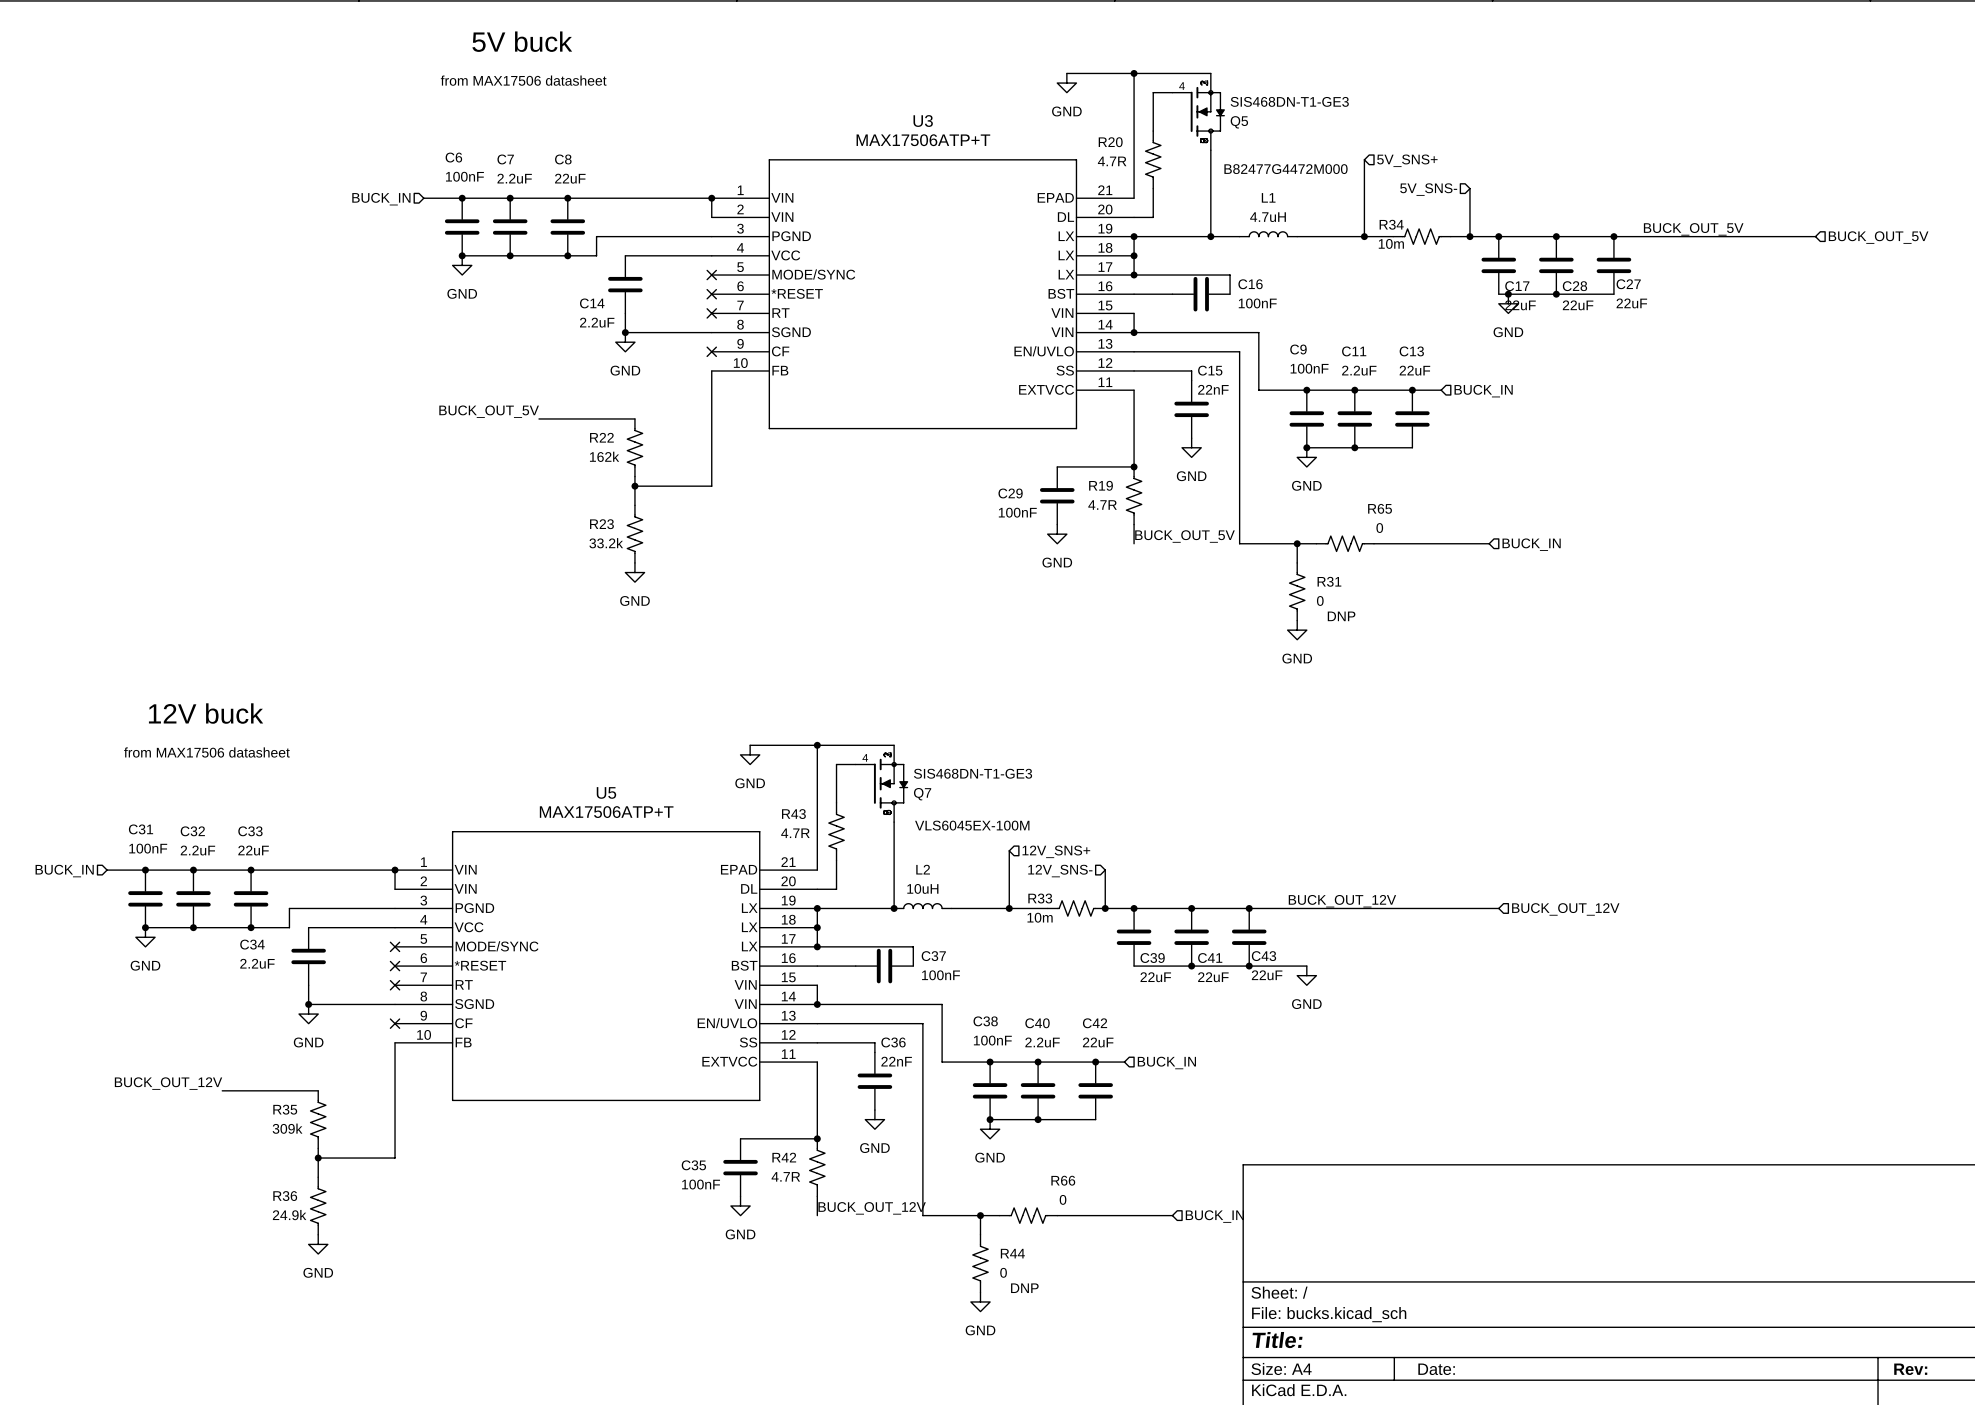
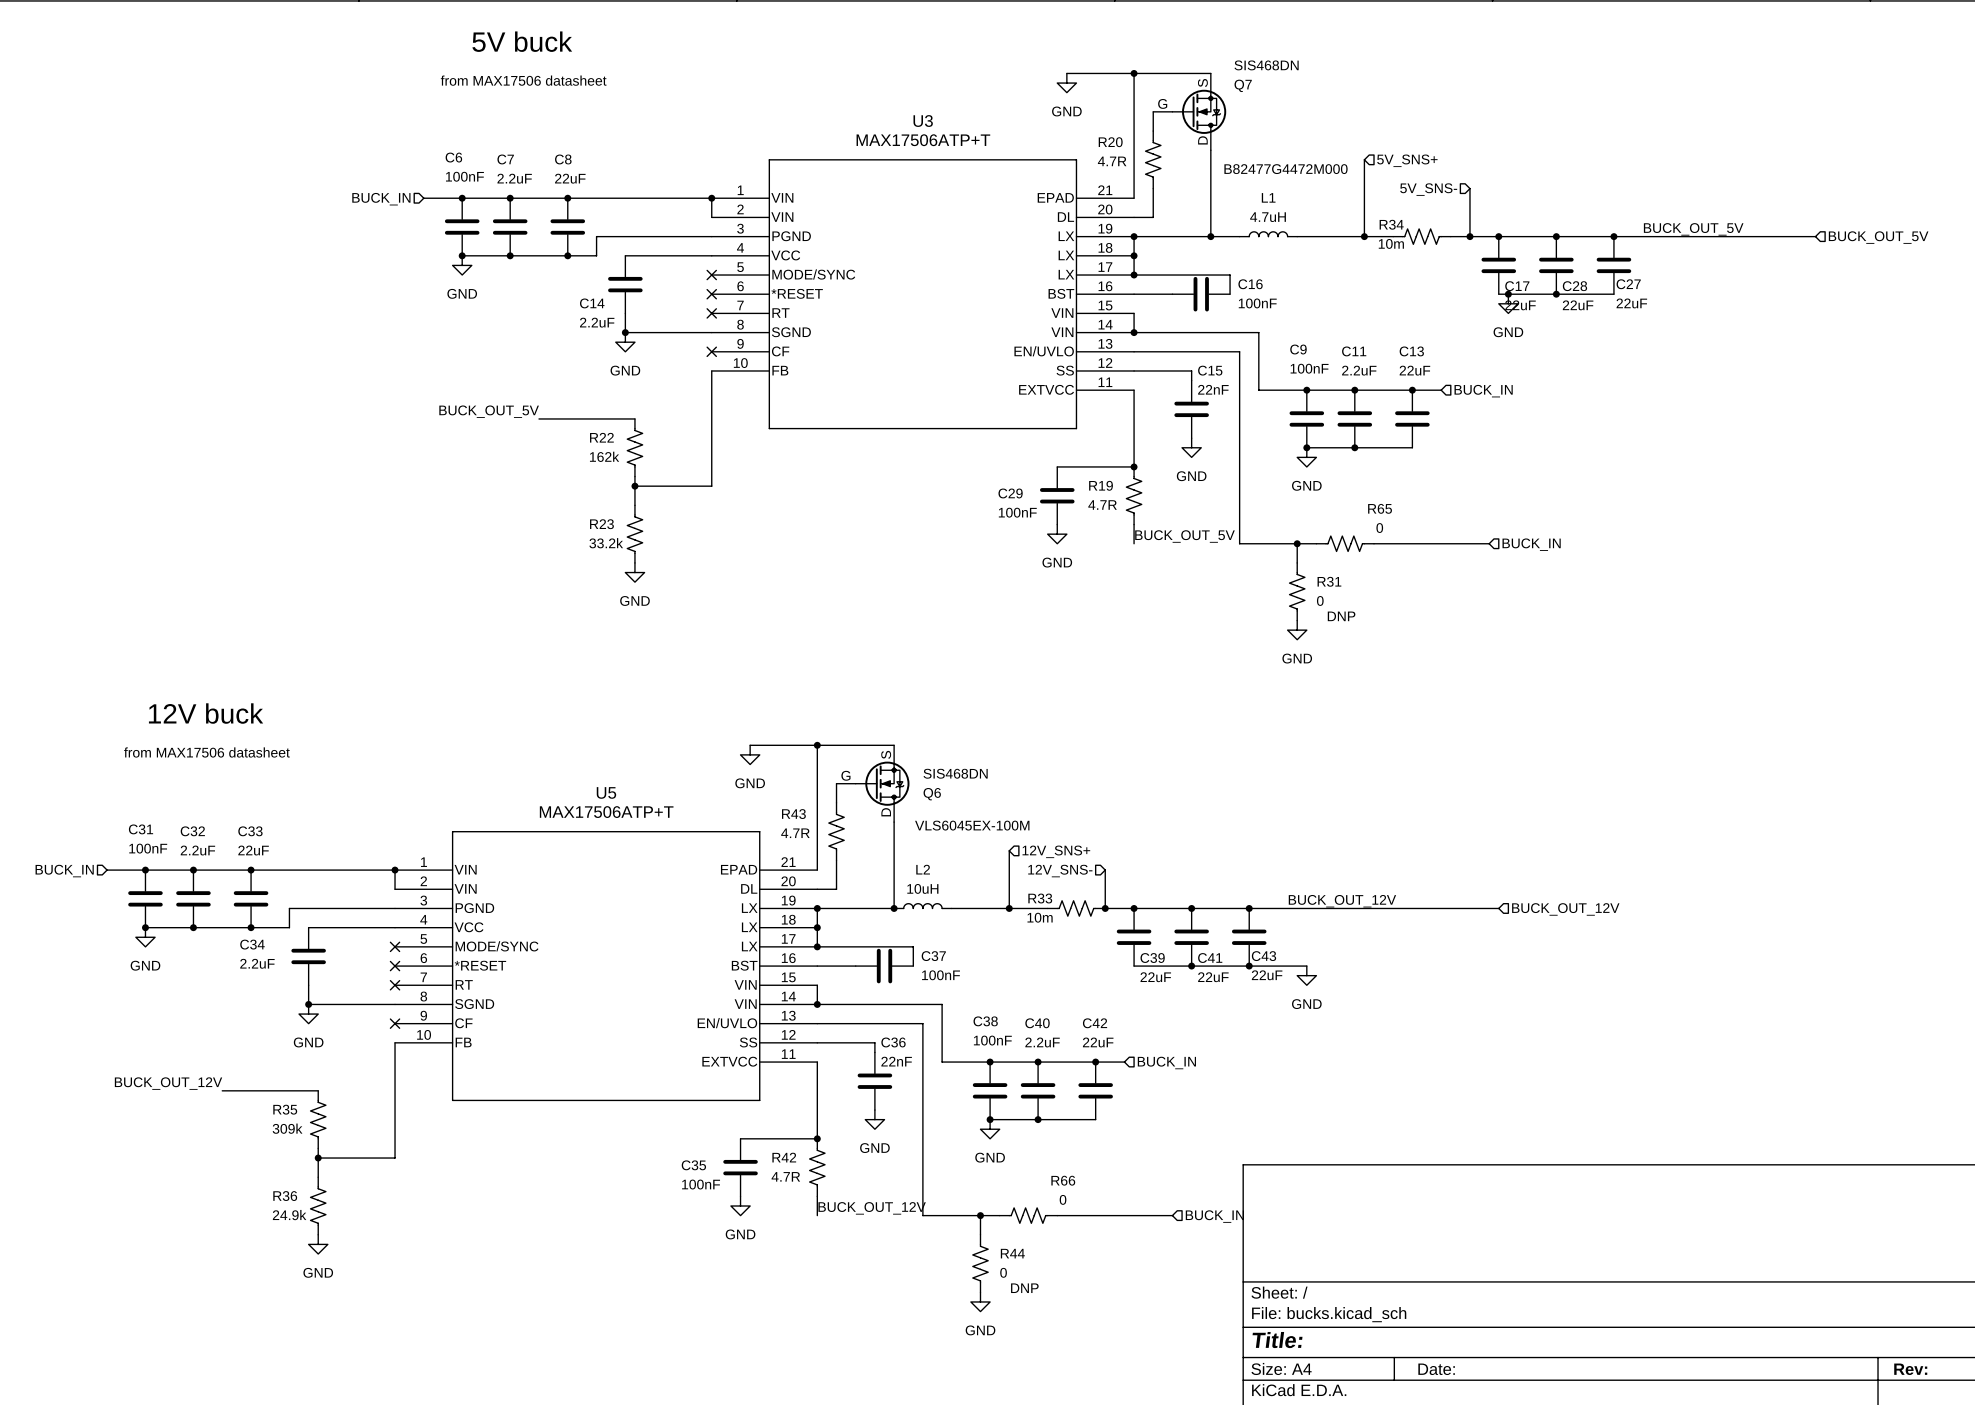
wire: (1172, 92) (1153, 92) (1153, 111) -> none
Q5: SIS468DN-T1-GE3 (1198, 111) -> none
Q7 symbol: [855, 745, 909, 823] -> [1153, 73, 1227, 151]
wire: (855, 764) (836, 764) (836, 783) -> none
Q7 value: SIS468DN-T1-GE3 (973, 773) -> SIS468DN (1266, 65)
Q6: none -> SIS468DN (872, 783)
Q7 name position: Q7 (922, 794) -> Q7 (1243, 85)

